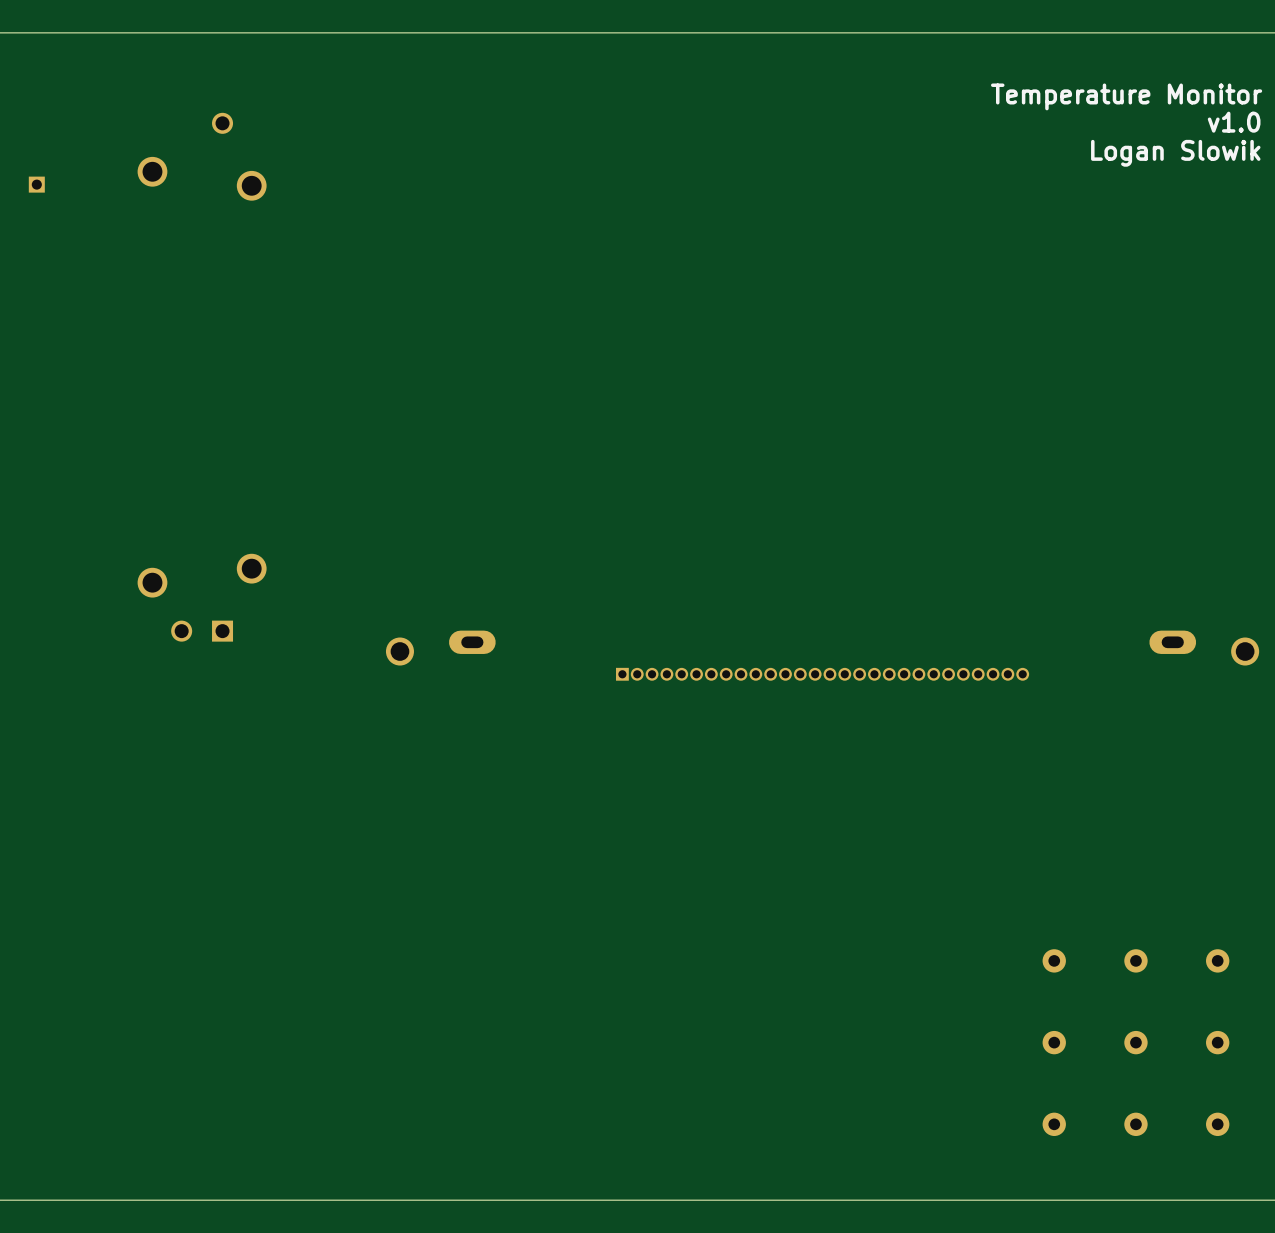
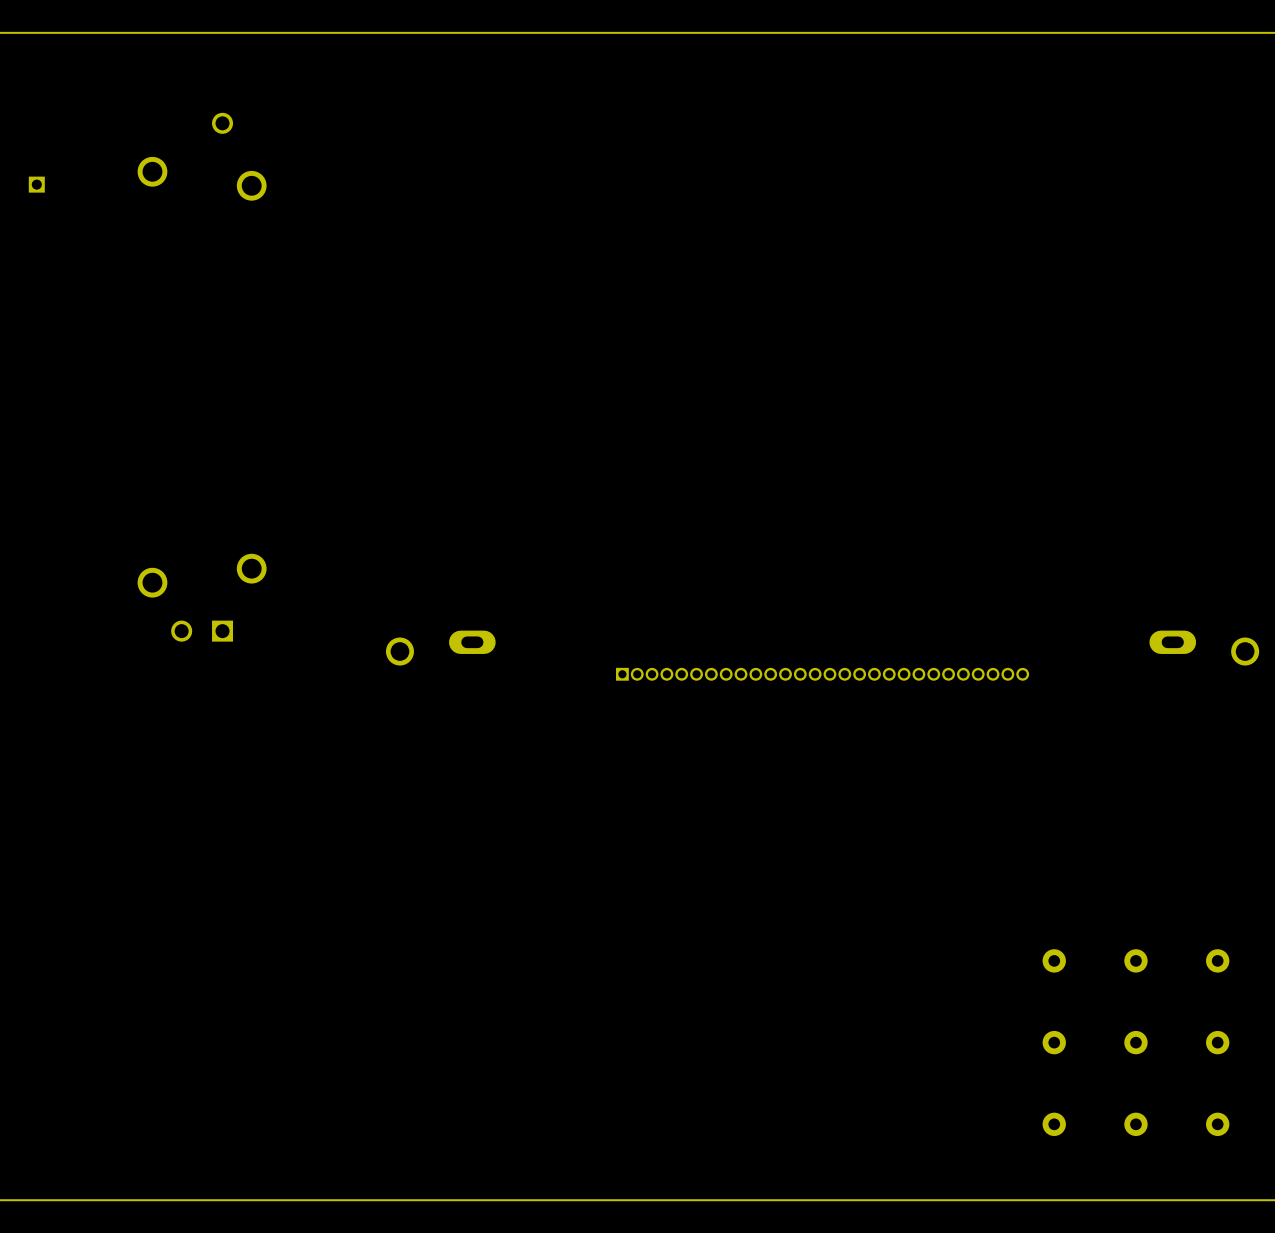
text: Temperature Monitor (1126, 96) -> none
text: v1.0 (1234, 122) -> none
text: Logan Slowik (1175, 153) -> none

